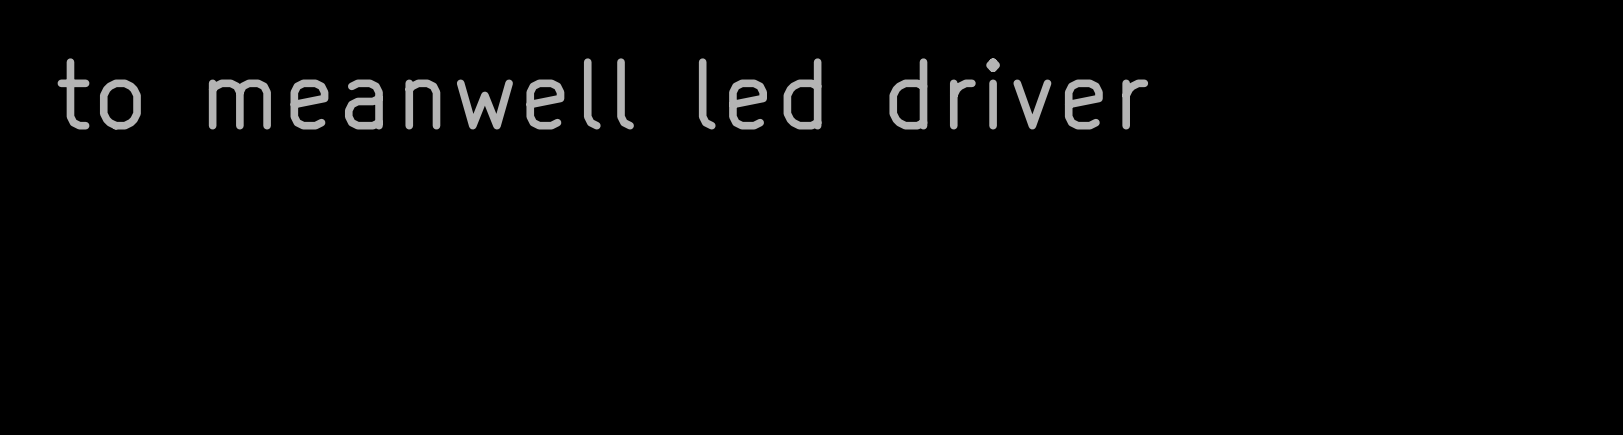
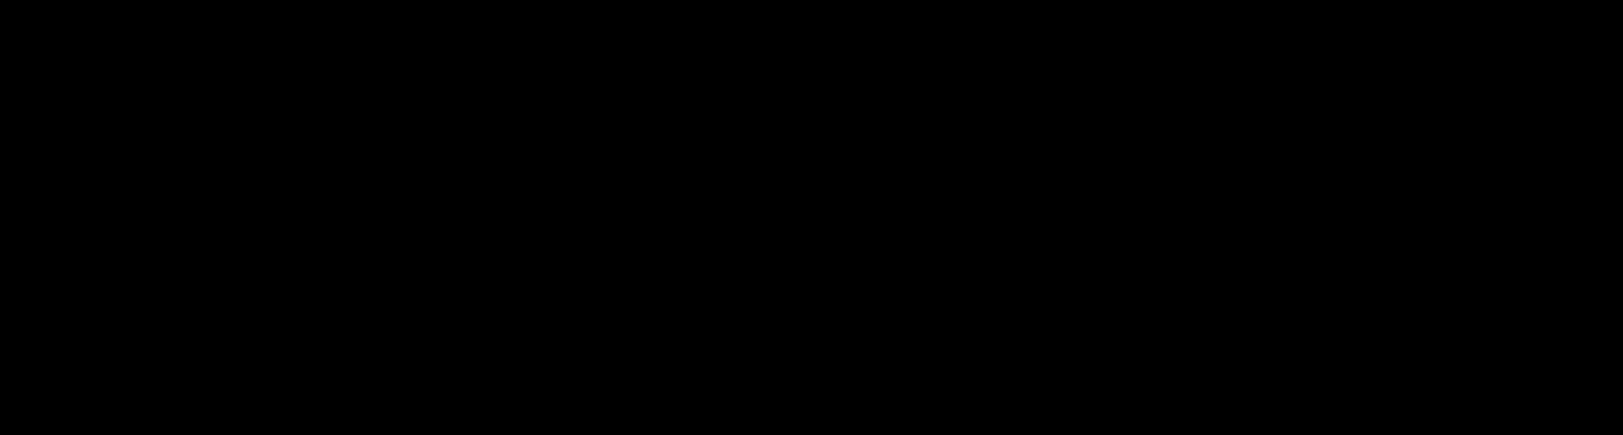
label: to meanwell led driver (602, 93) -> none

